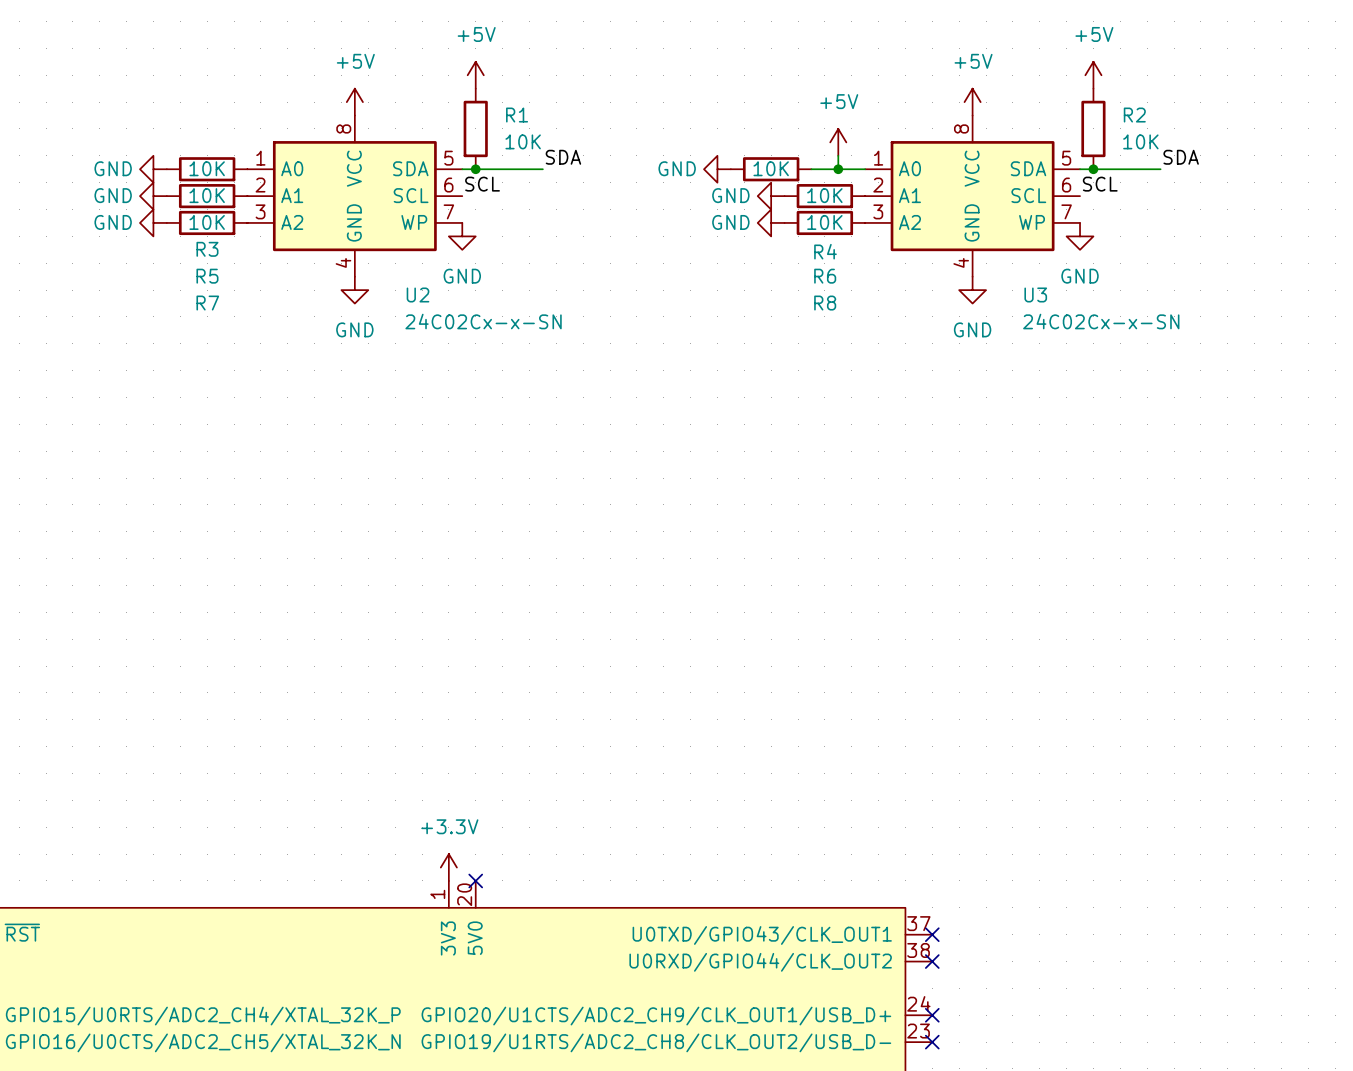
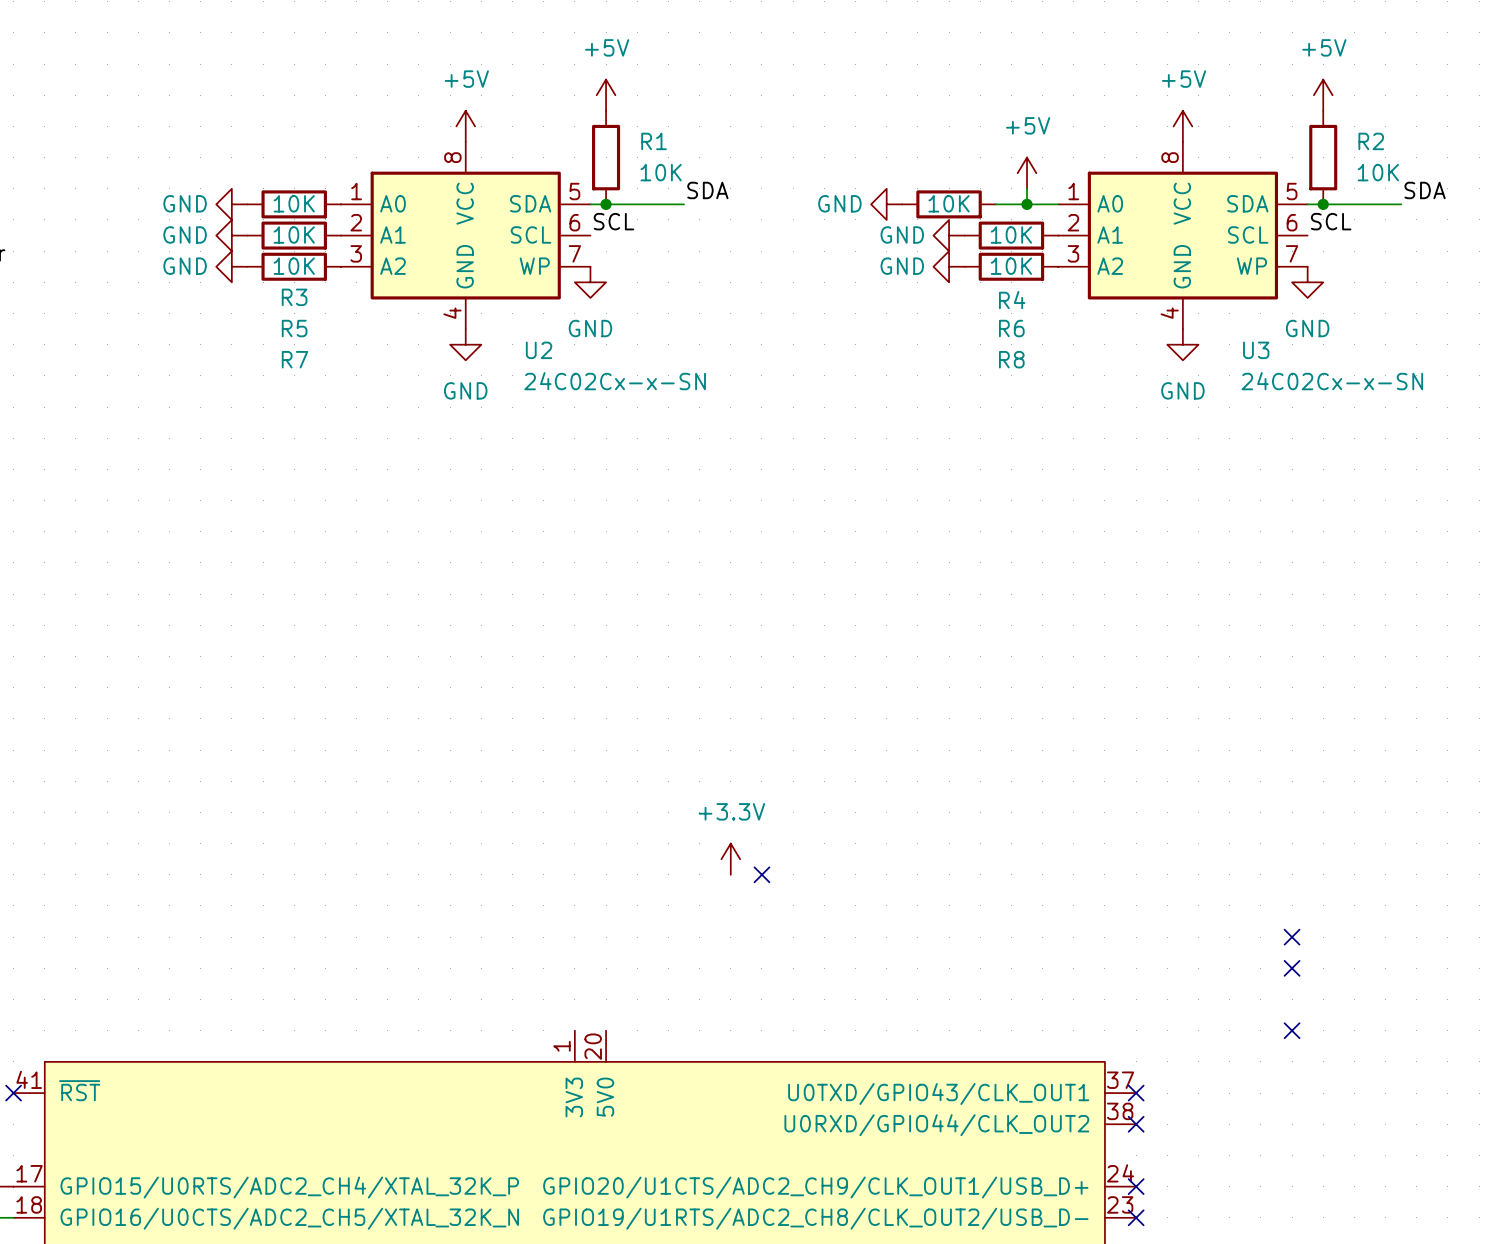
no-connect mark: none -> (761, 874)
no-connect mark: none -> (1292, 937)
no-connect mark: none -> (1292, 968)
power symbol position: +3.3V (448, 867) -> +3.3V (730, 859)
no-connect mark: (475, 880) -> none
no-connect mark: none -> (1292, 1030)

